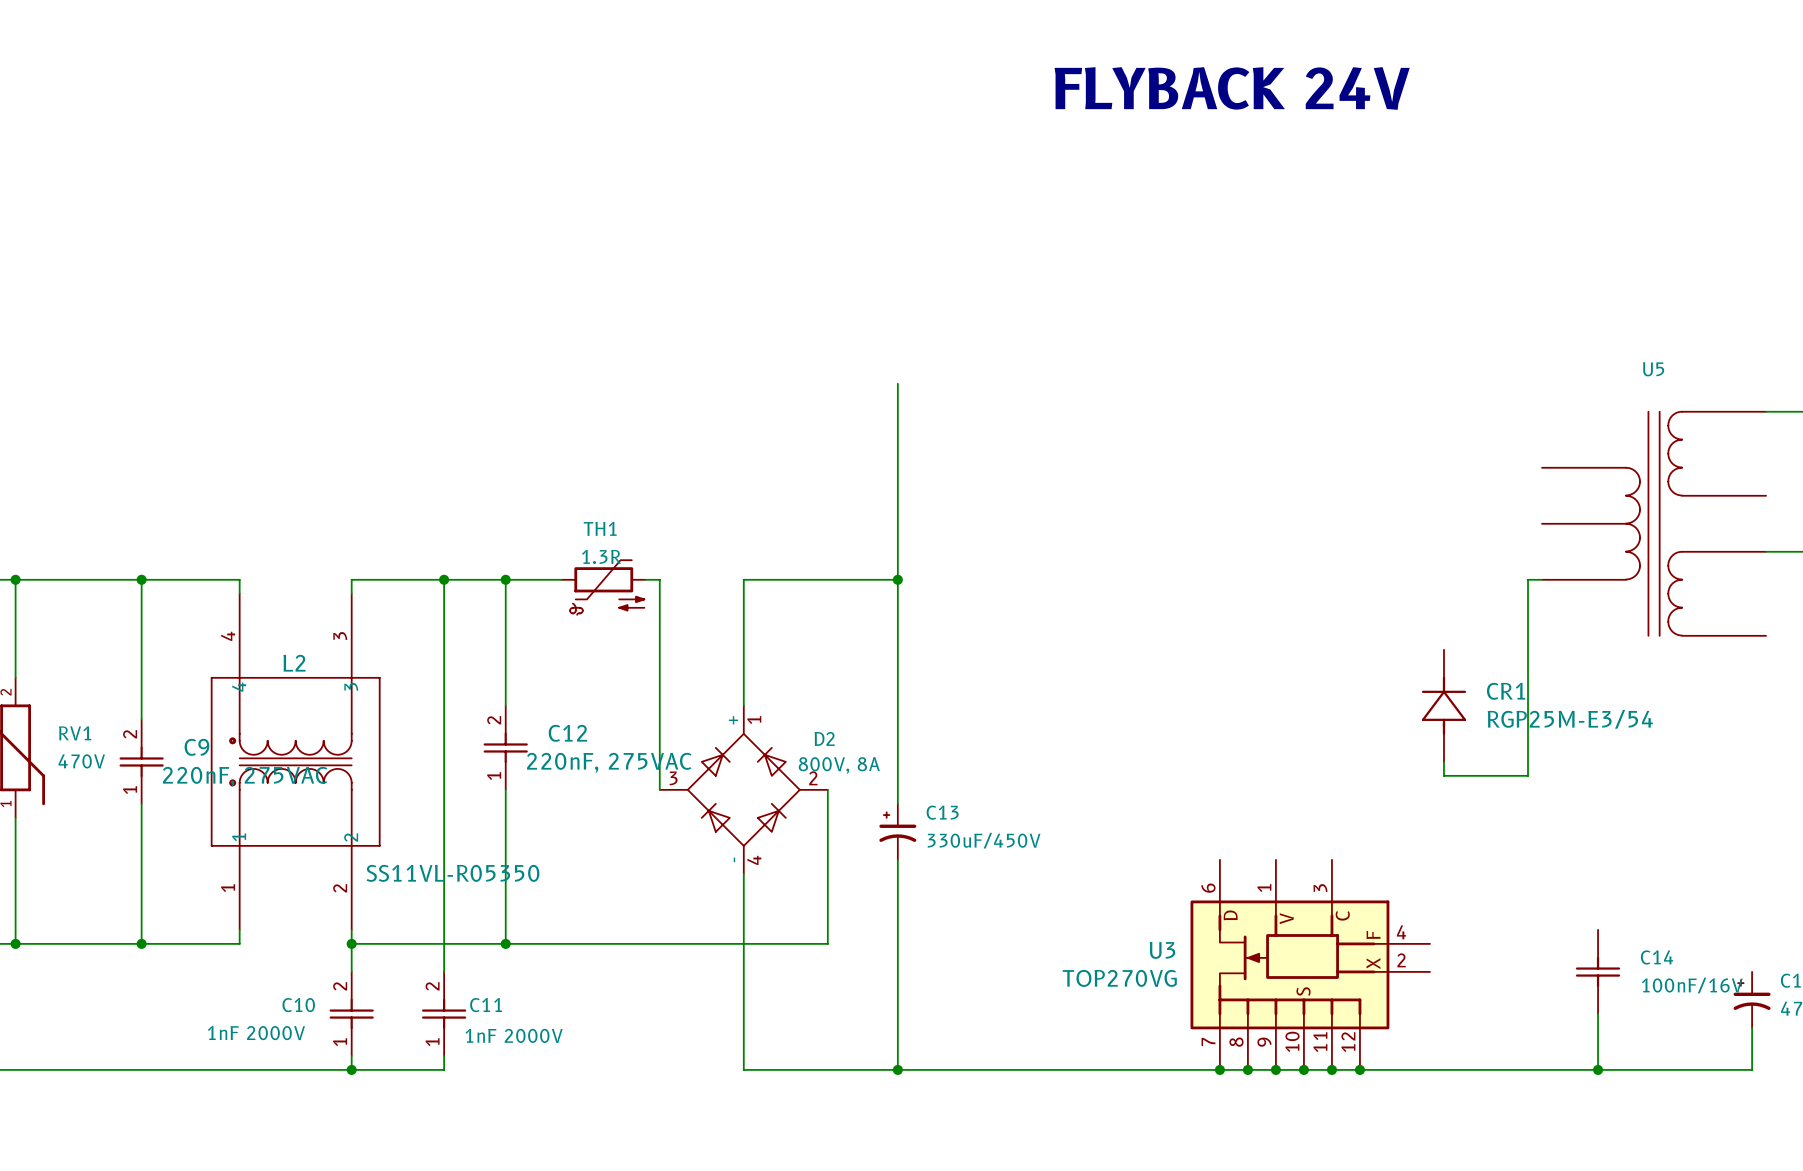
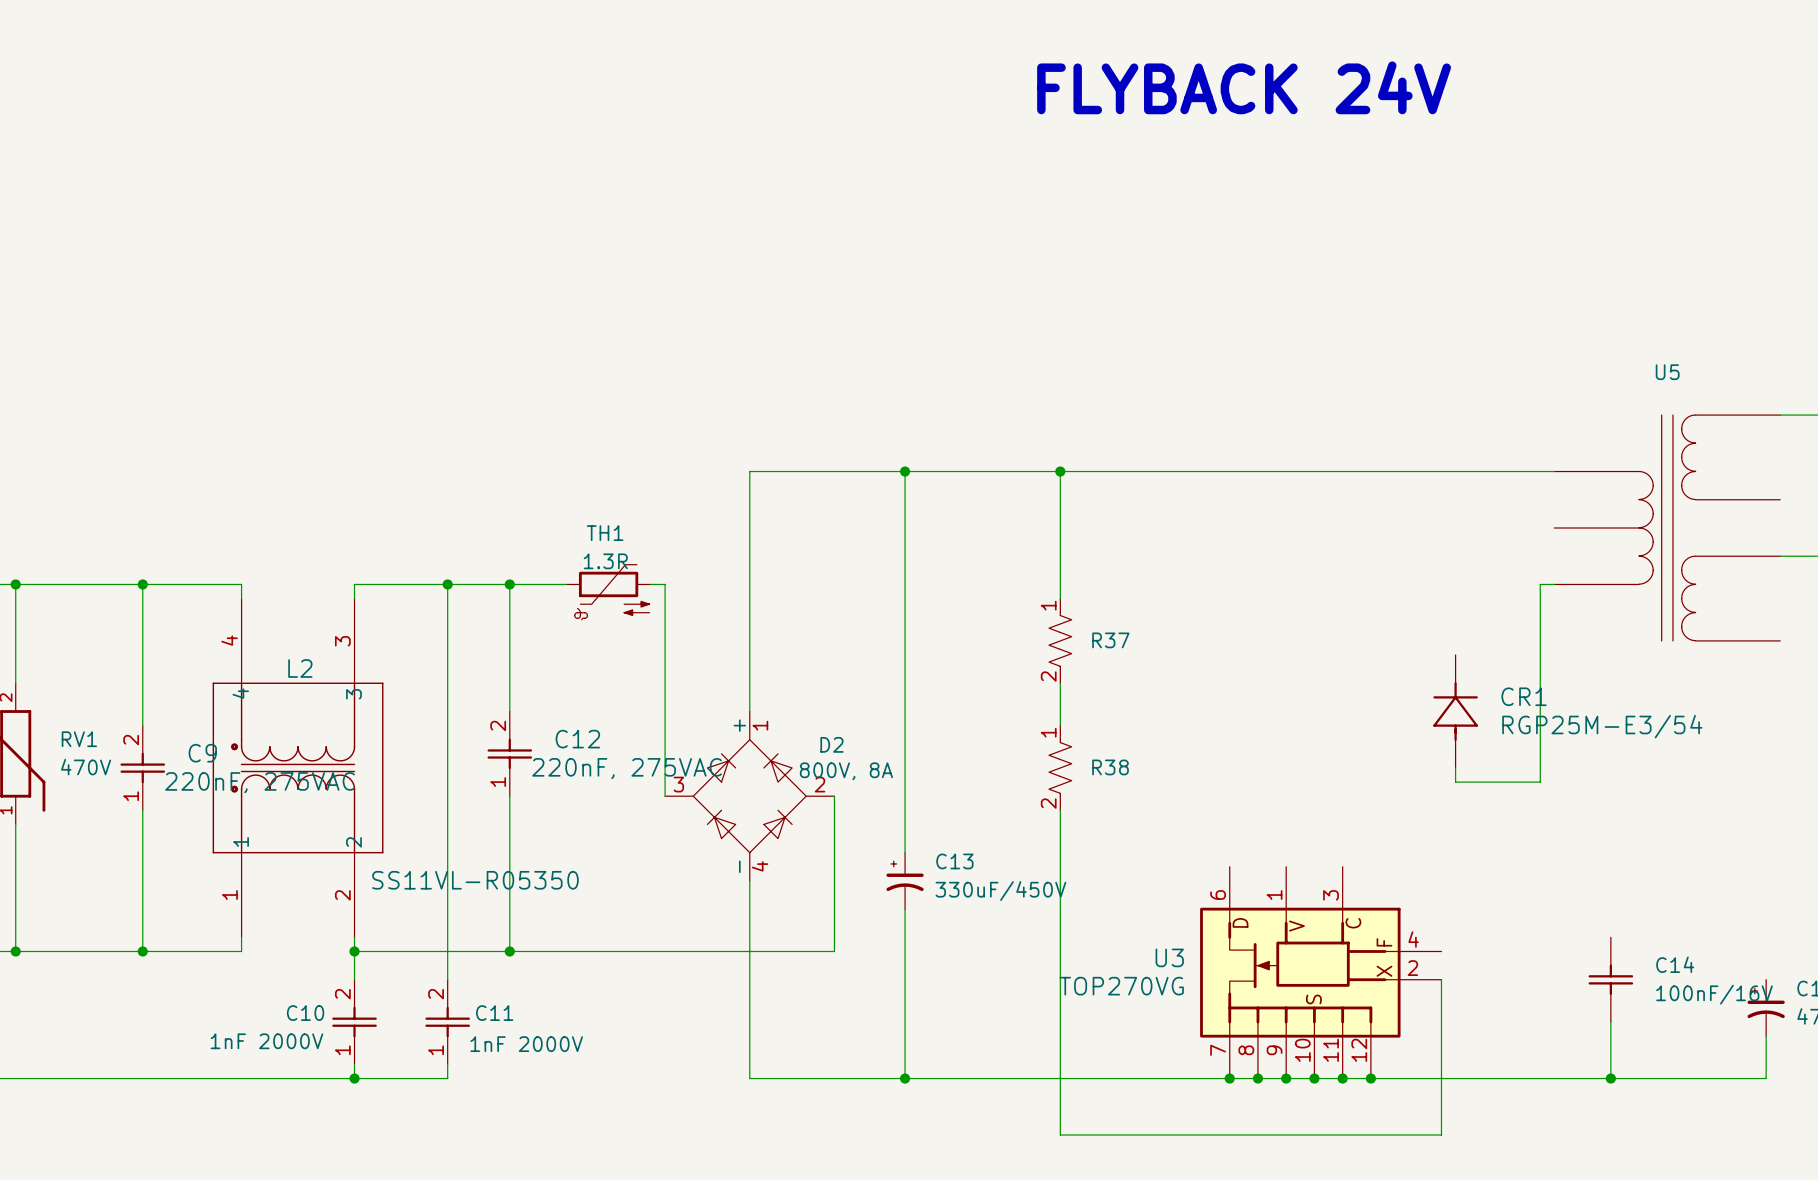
wire: (897, 383) (897, 467) -> none
junction: none -> (905, 471)
wire: none -> (1060, 471) (1060, 598)
junction: none -> (1060, 471)
wire: (743, 579) (897, 579) -> (749, 584) (749, 471) (1554, 471)
junction: (897, 579) -> none
R37: none -> (1060, 640)
wire: none -> (1060, 683) (1060, 725)
R38: none -> (1060, 767)
wire: none -> (1060, 810) (1060, 1135) (1441, 1135) (1441, 979)
C13 position: (897, 831) -> (905, 880)

